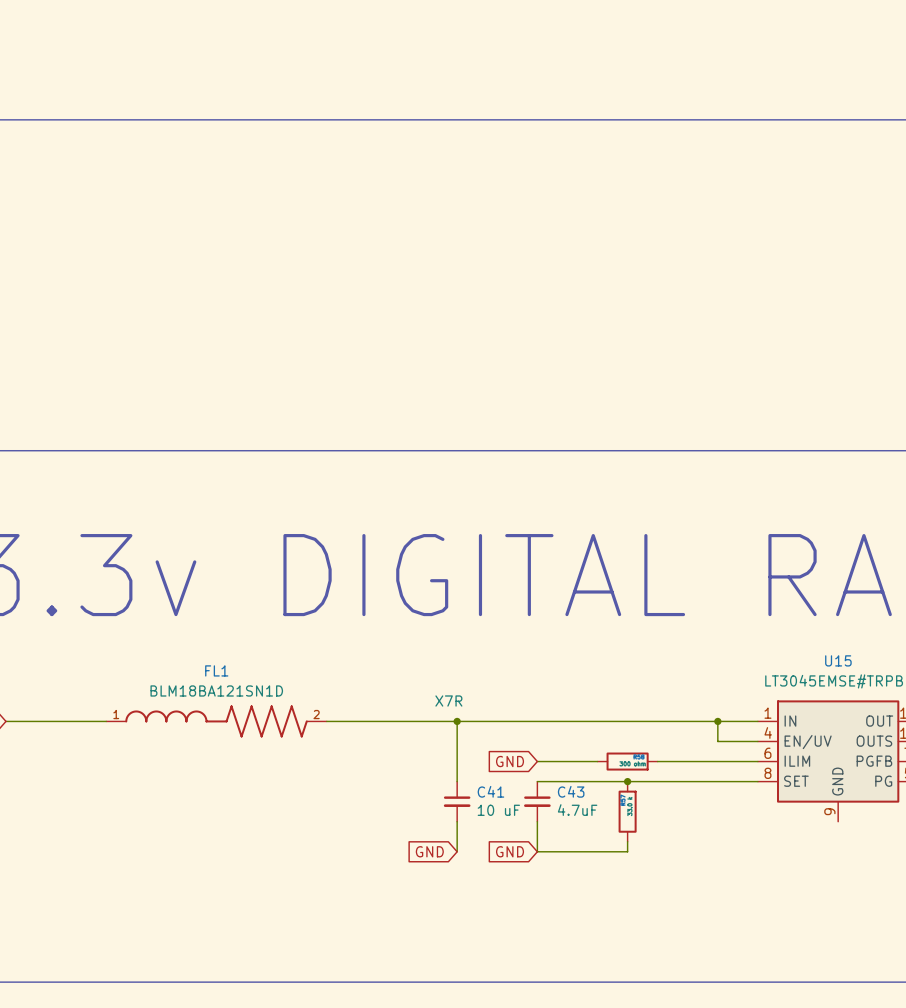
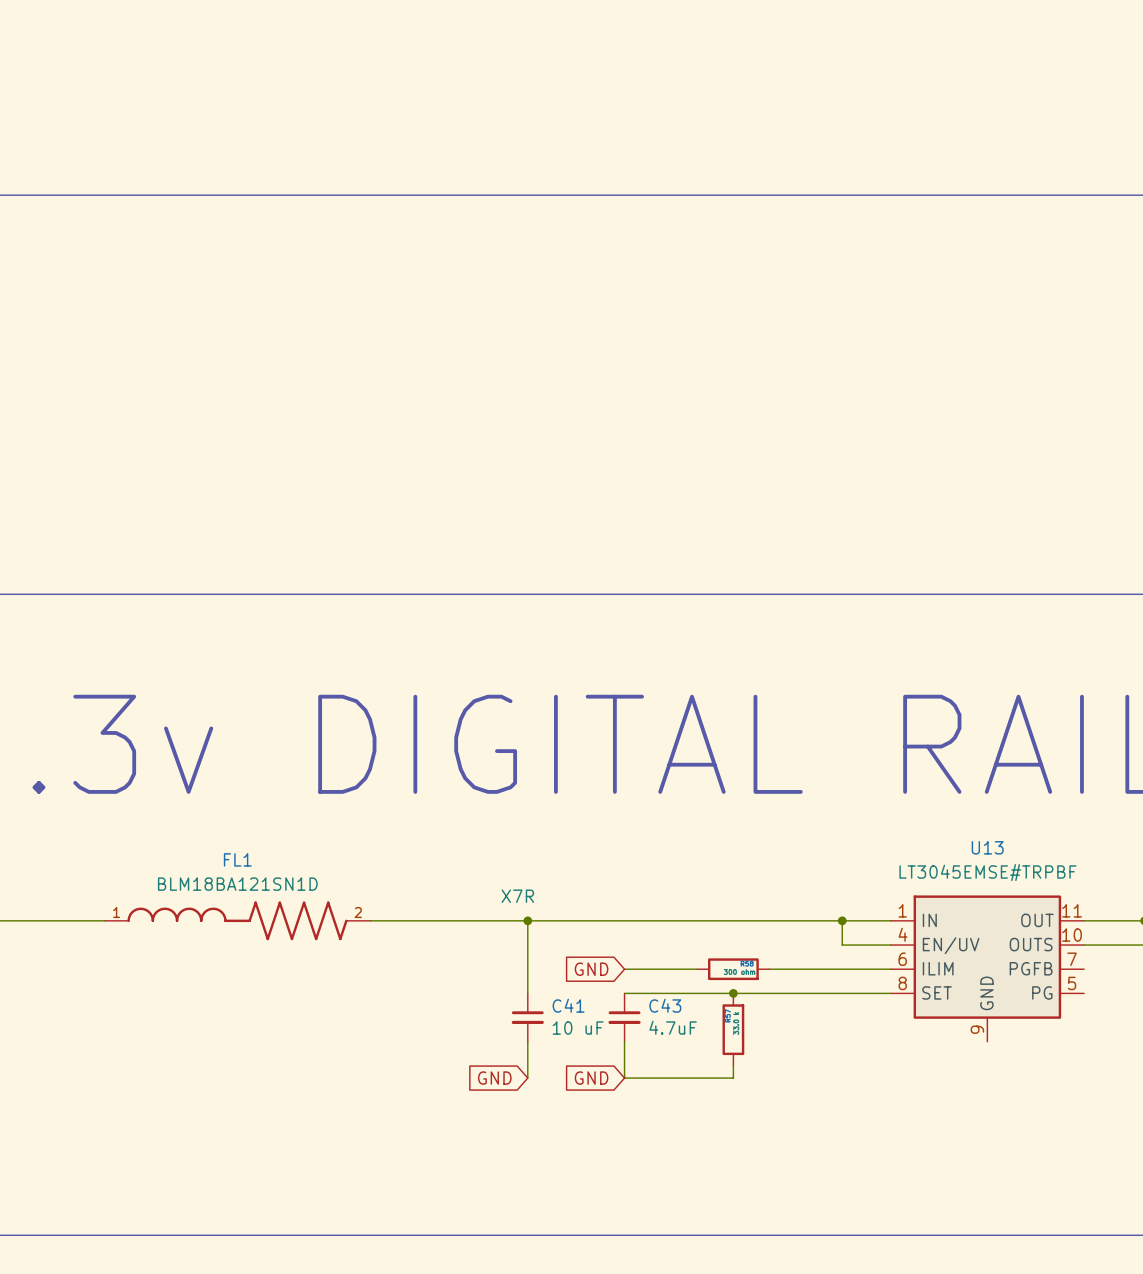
U15 name: U15 (838, 660) -> U13 (987, 847)

